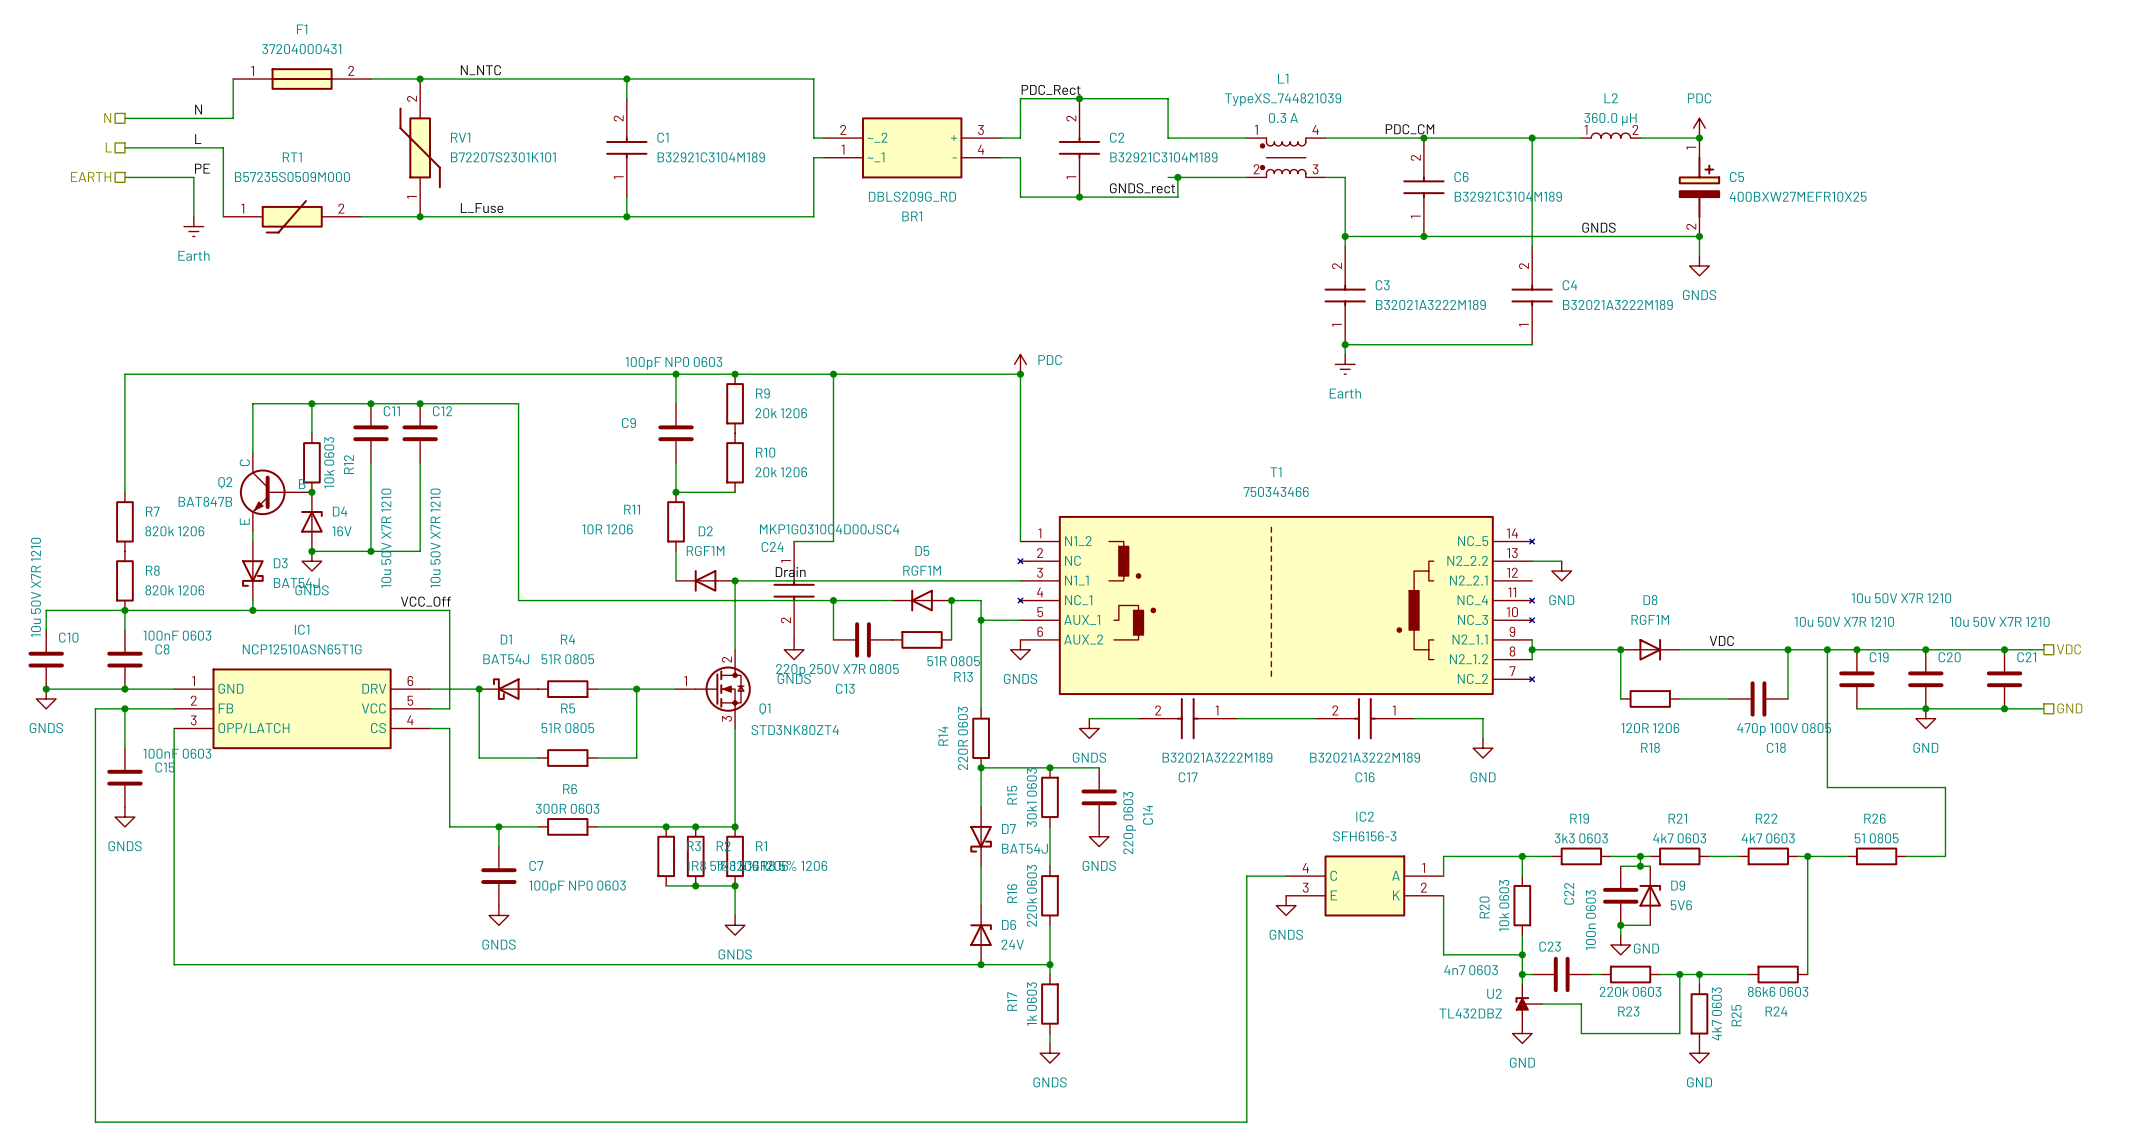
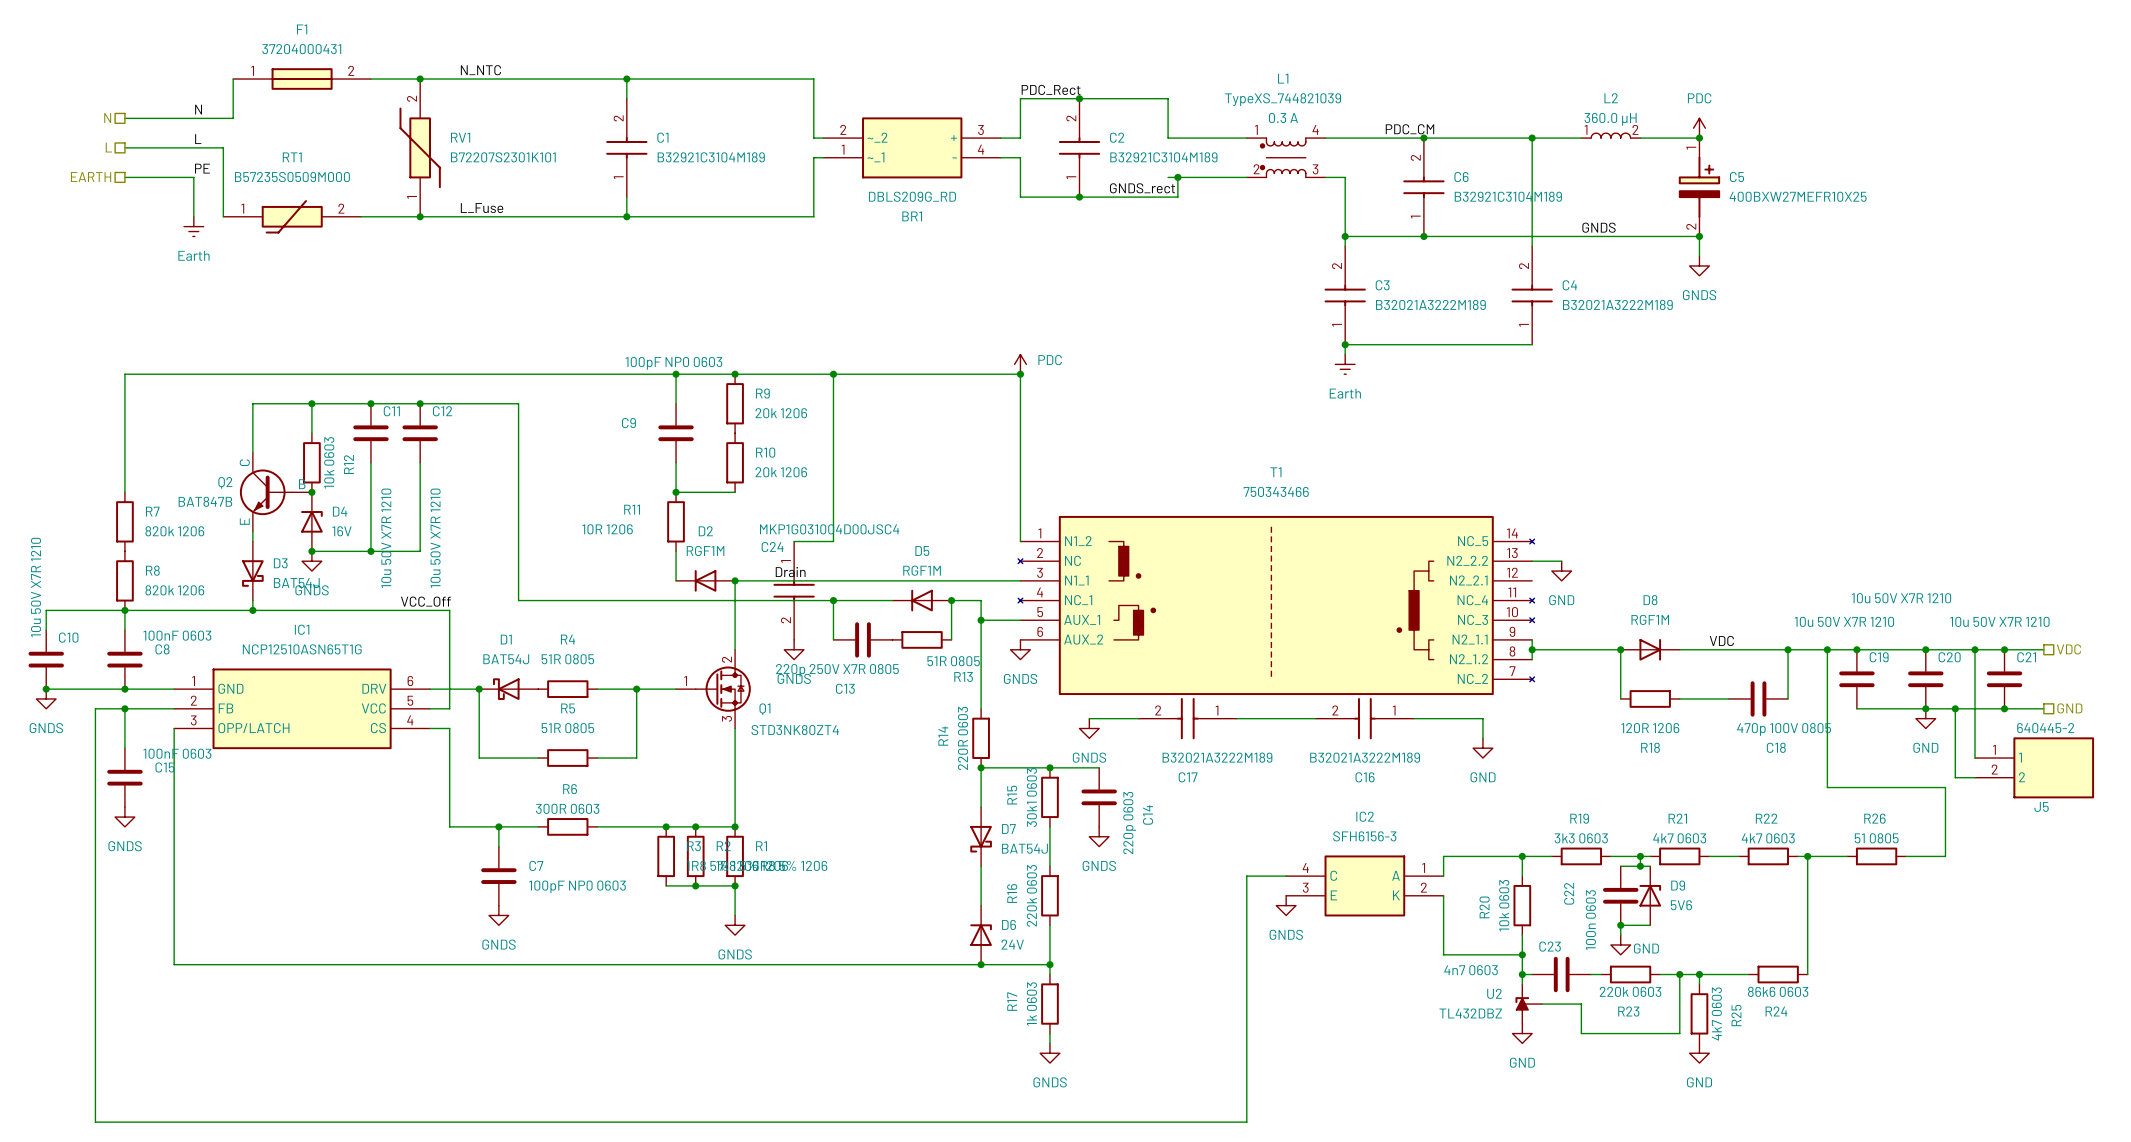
wire: none -> (1975, 649) (1975, 758)
junction: none -> (1975, 649)
wire: none -> (1955, 708) (1955, 777) (1975, 777)
junction: none -> (1955, 708)
J5: none -> 640445-2 (2034, 767)

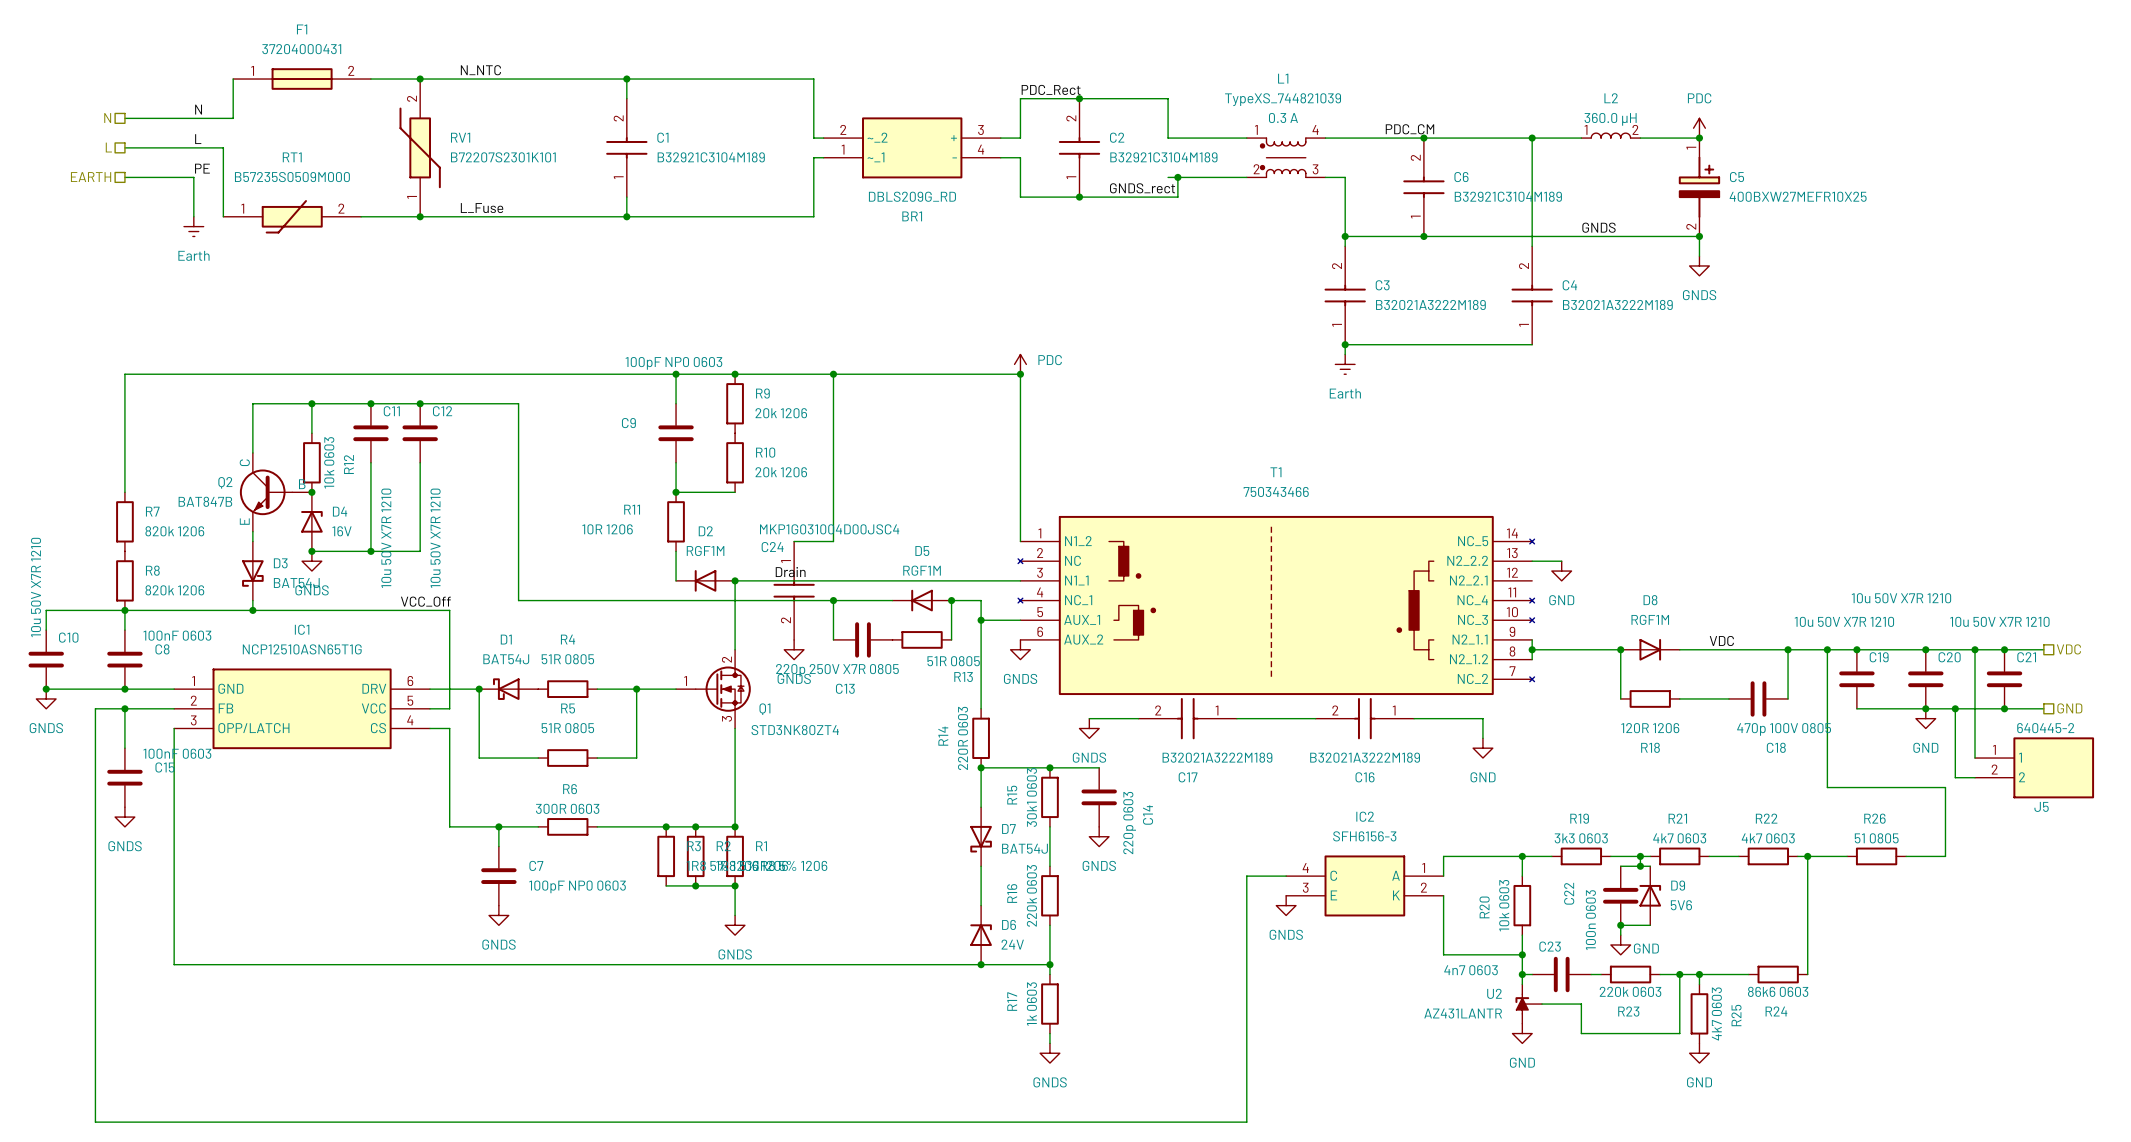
U2 value: TL432DBZ (1470, 1013) -> AZ431LANTR (1463, 1013)

